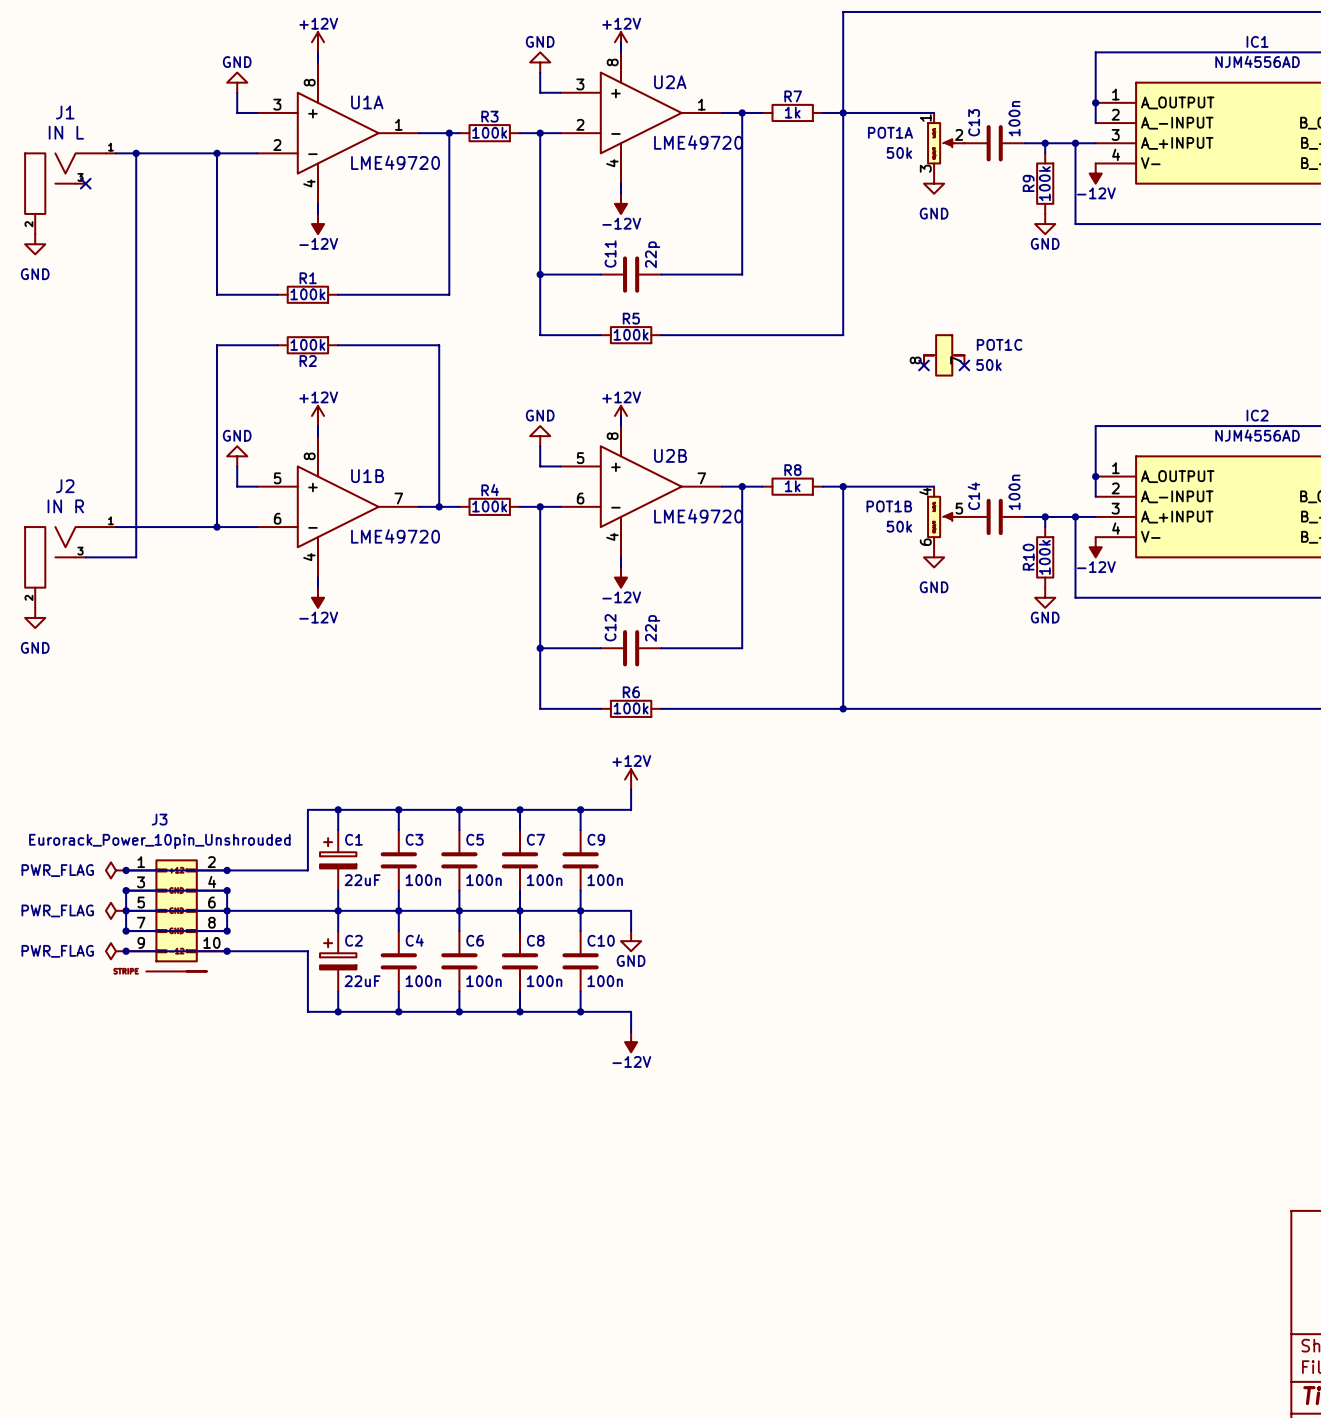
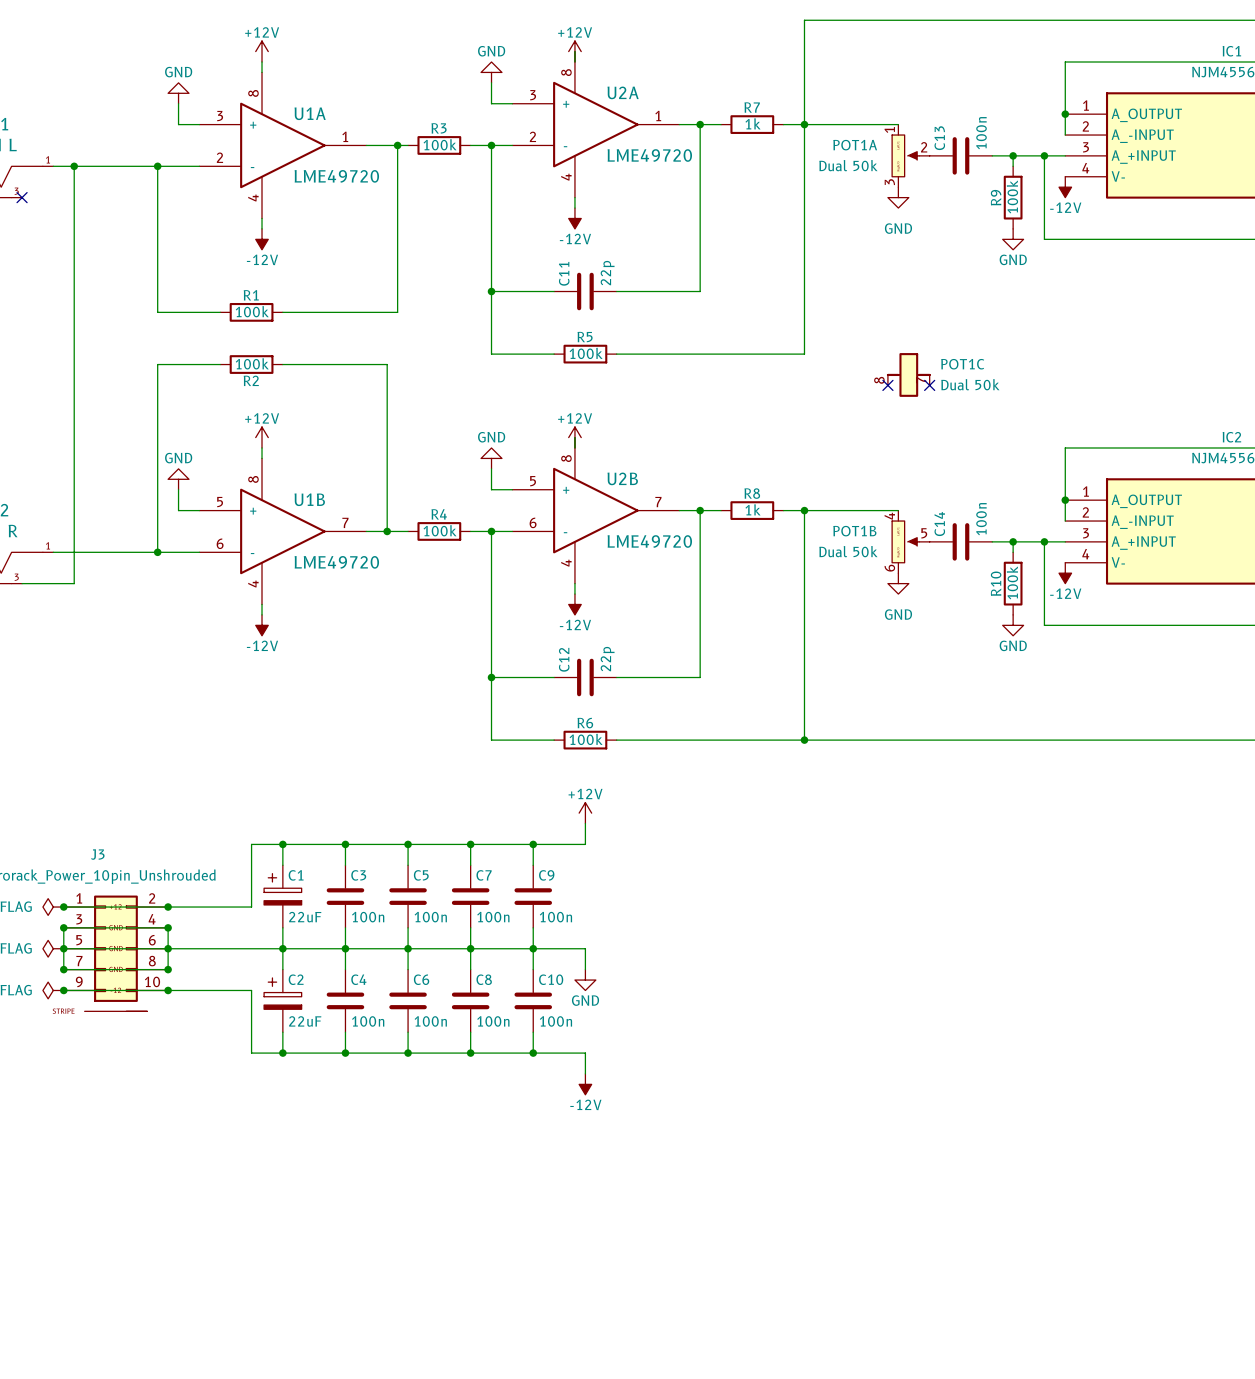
POT1A text: 50k (899, 152) -> Dual 50k (848, 165)
POT1C text: 50k (989, 365) -> Dual 50k (970, 384)
POT1B text: 50k (899, 526) -> Dual 50k (848, 551)

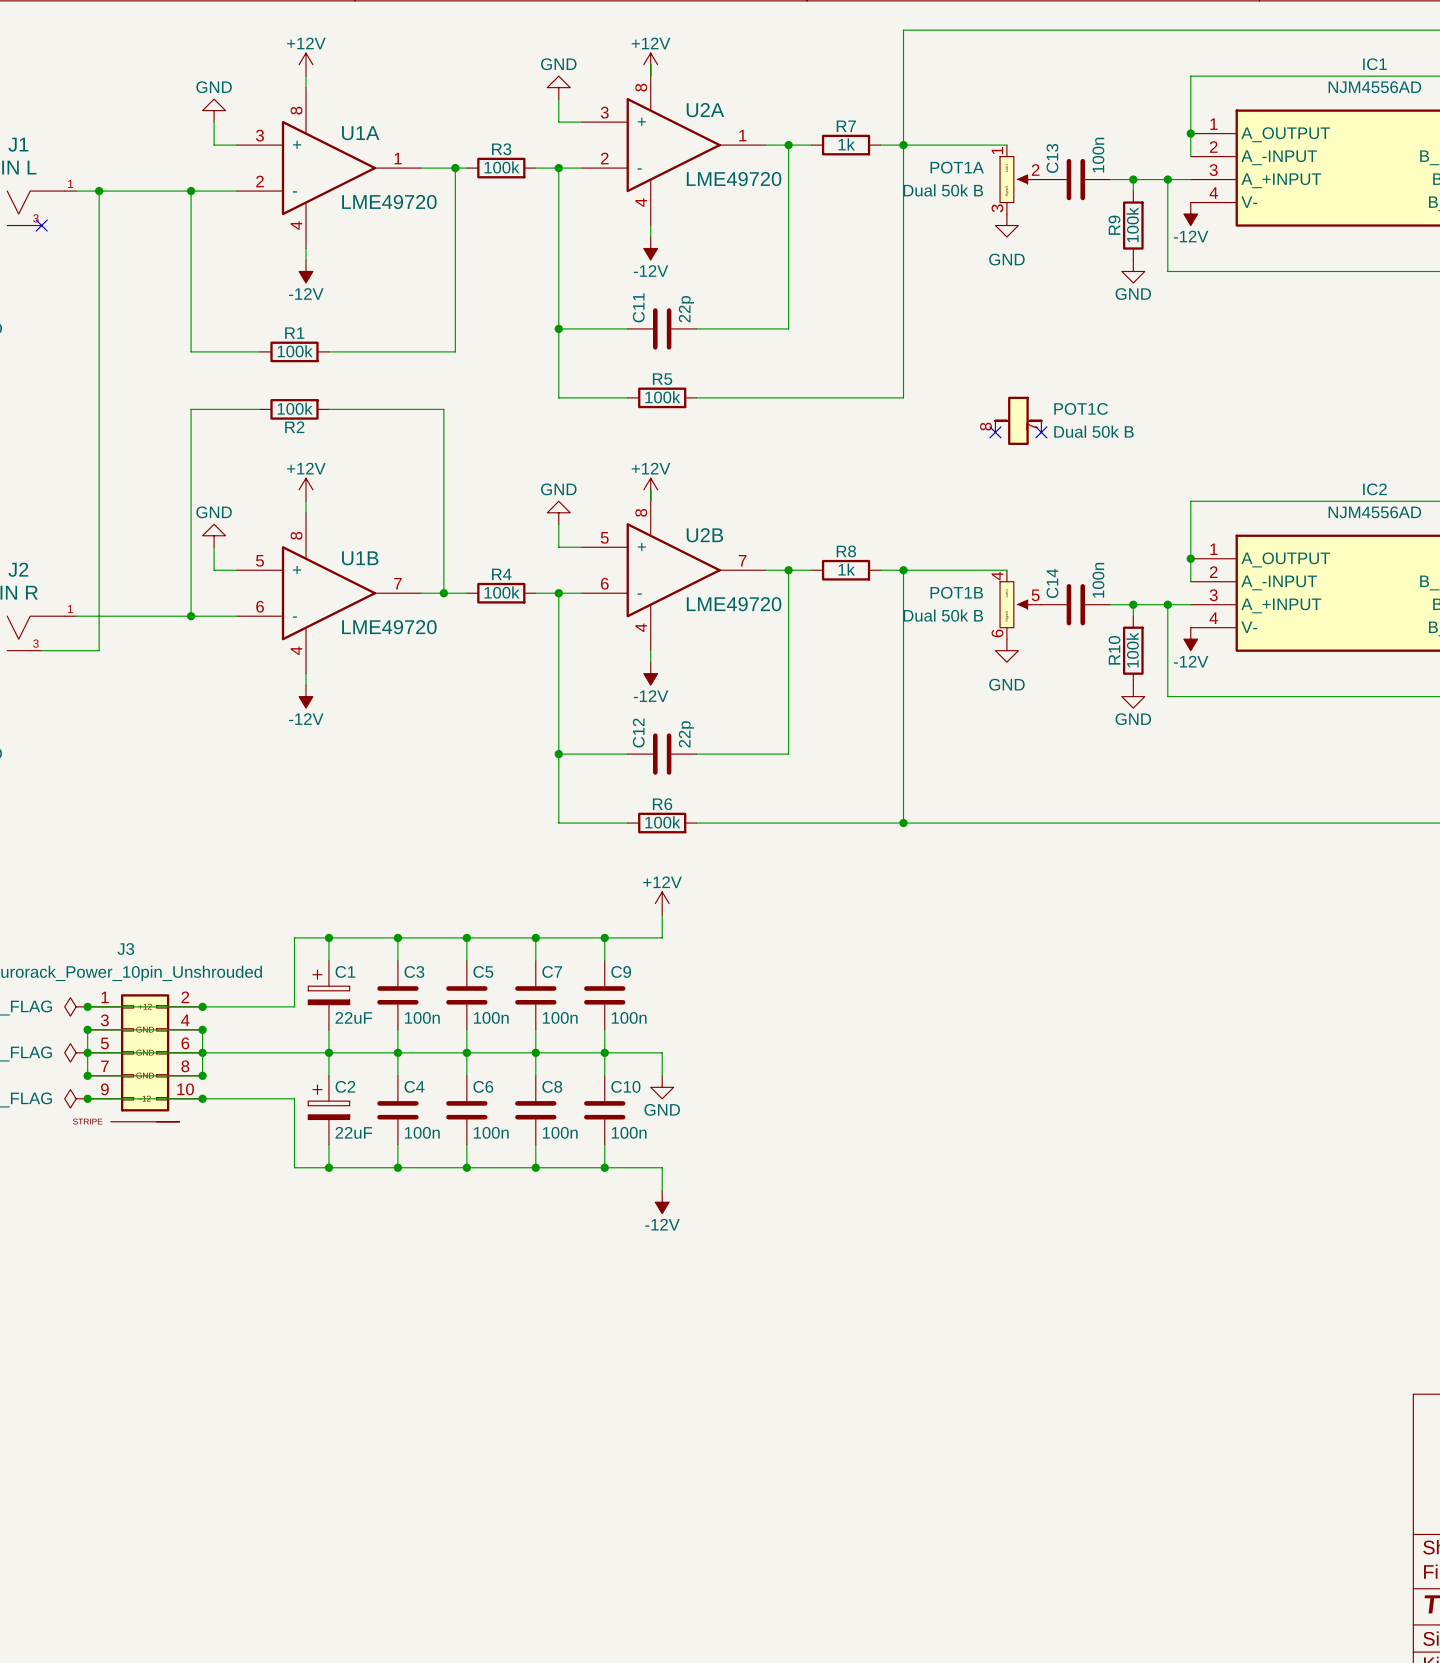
POT1A text: Dual 50k (848, 165) -> Dual 50k B (943, 190)
POT1C text: Dual 50k (970, 384) -> Dual 50k B (1093, 431)
POT1B text: Dual 50k (848, 551) -> Dual 50k B (943, 615)

